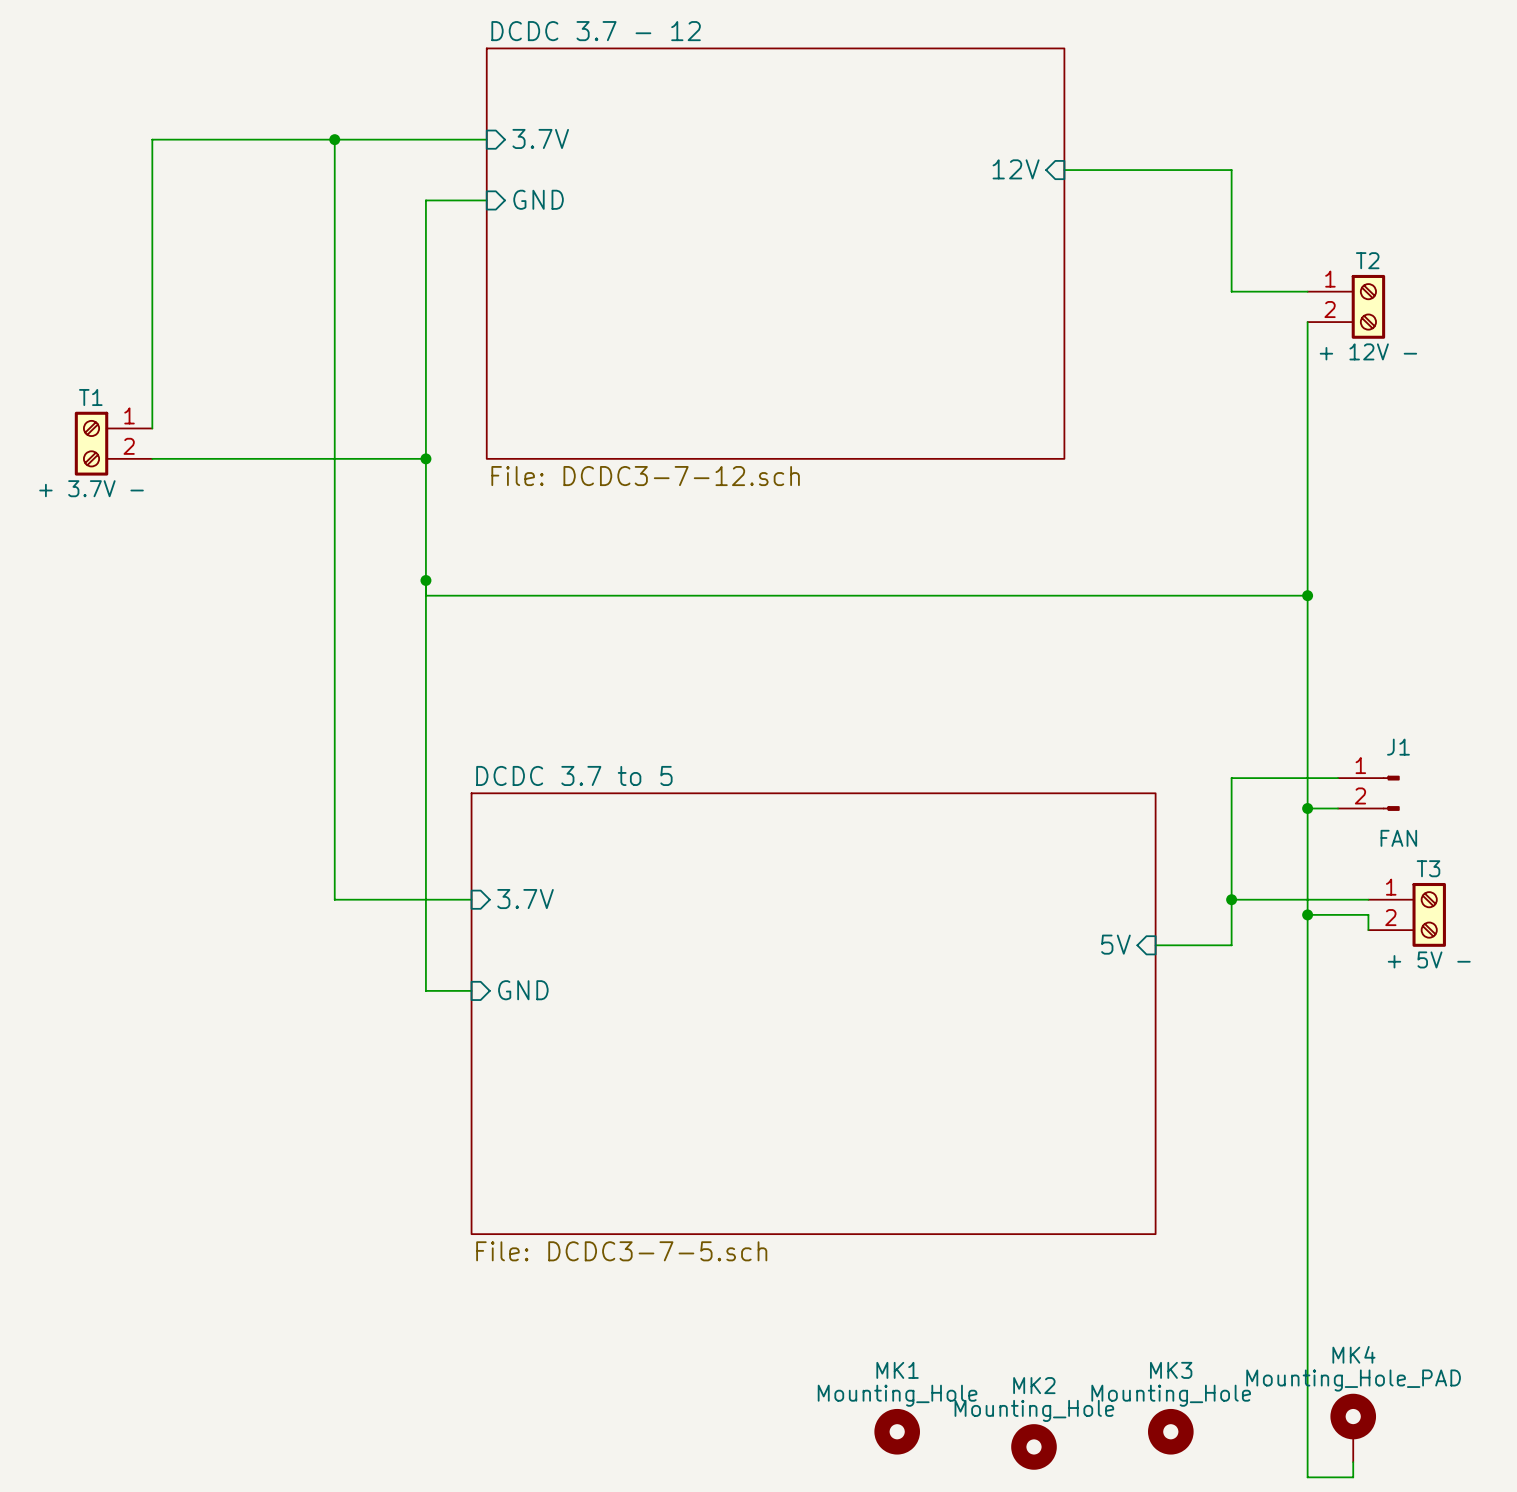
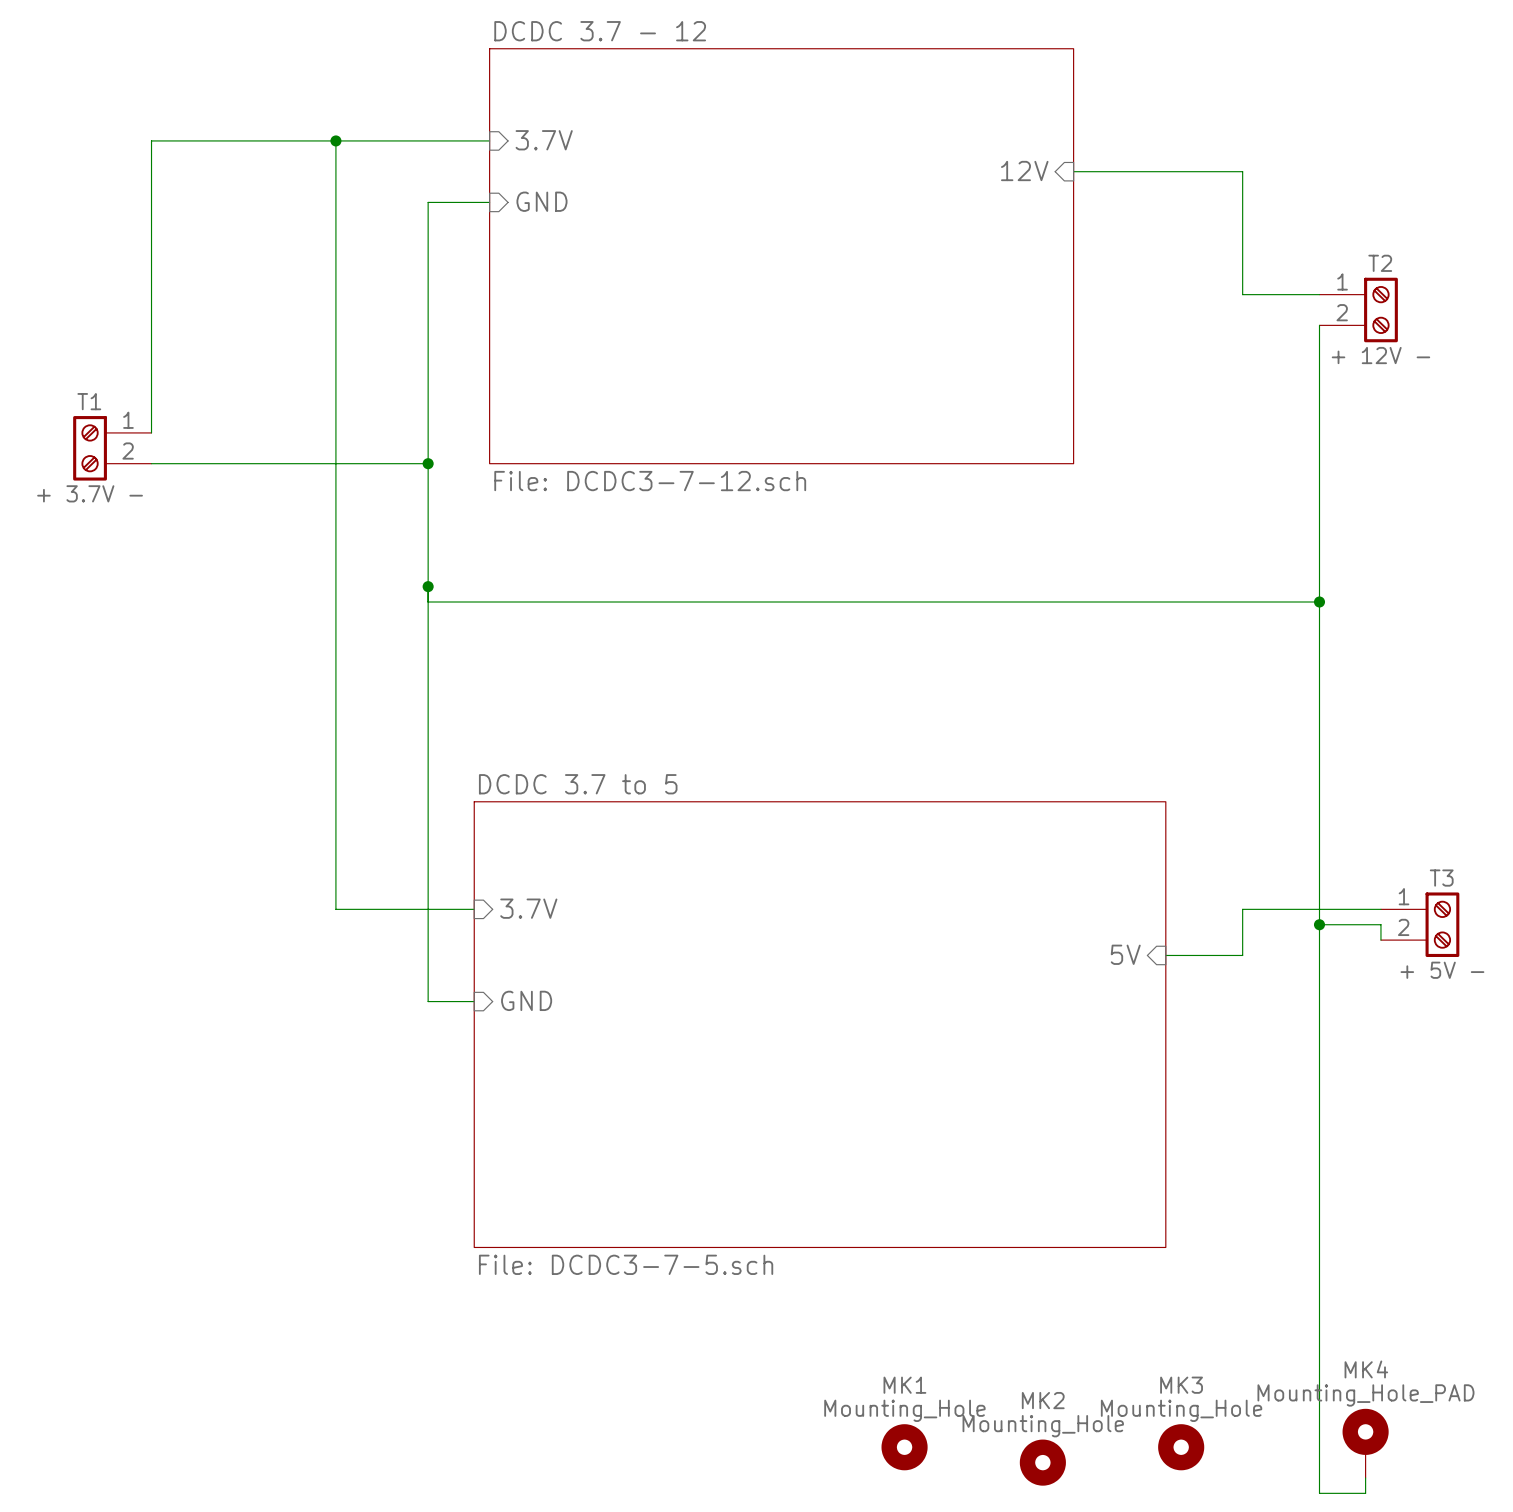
wire: (1338, 778) (1231, 778) (1231, 899) -> none
J1: FAN (1368, 793) -> none
wire: (1307, 808) (1338, 808) -> none
junction: (1307, 808) -> none
junction: (1231, 899) -> none

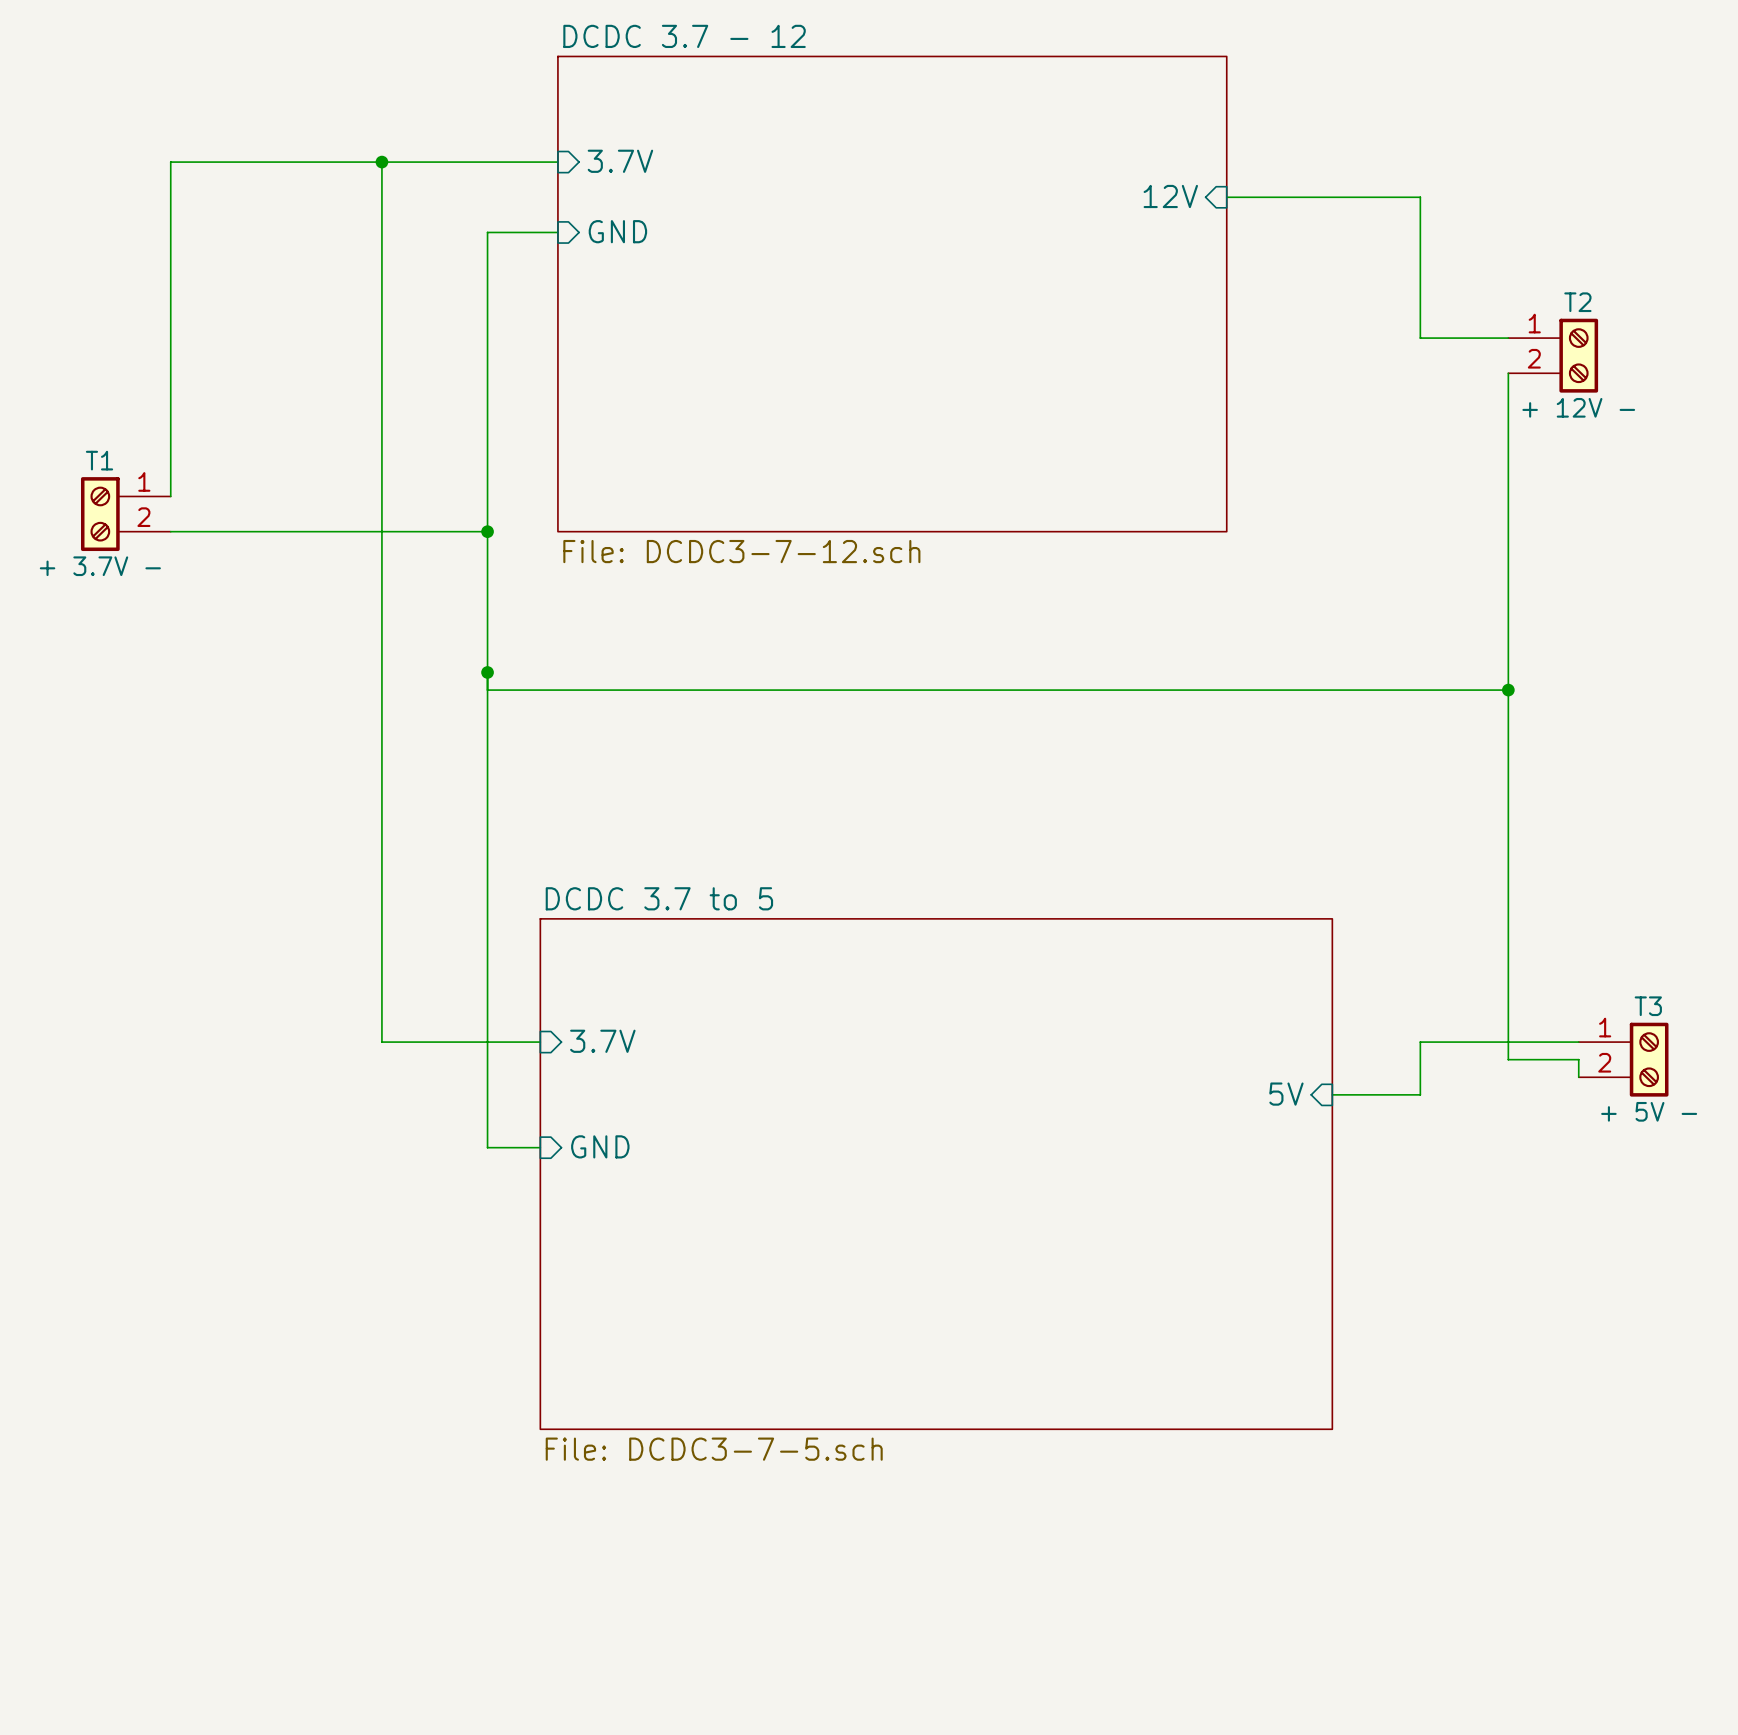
wire: (1319, 924) (1319, 1493) (1365, 1493) (1365, 1477) -> none
junction: (1319, 924) -> none
MK4: Mounting_Hole_PAD (1365, 1443) -> none
MK1: Mounting_Hole (904, 1447) -> none
MK3: Mounting_Hole (1181, 1447) -> none
MK2: Mounting_Hole (1042, 1462) -> none

